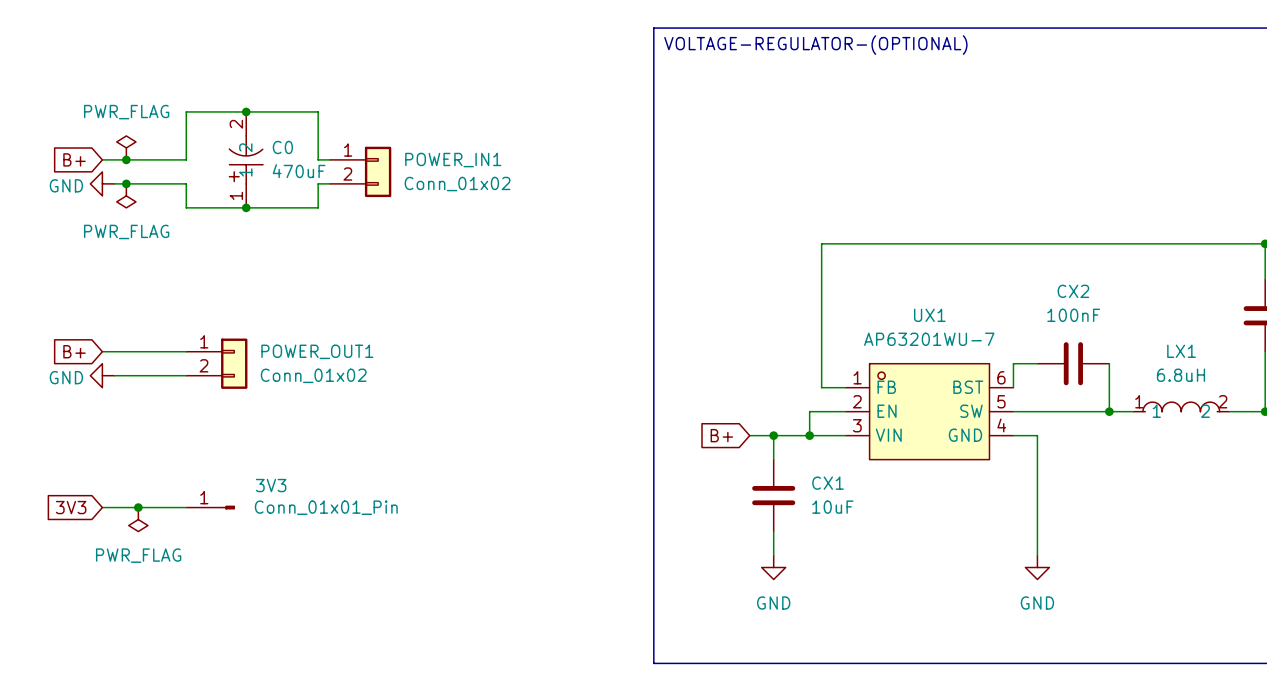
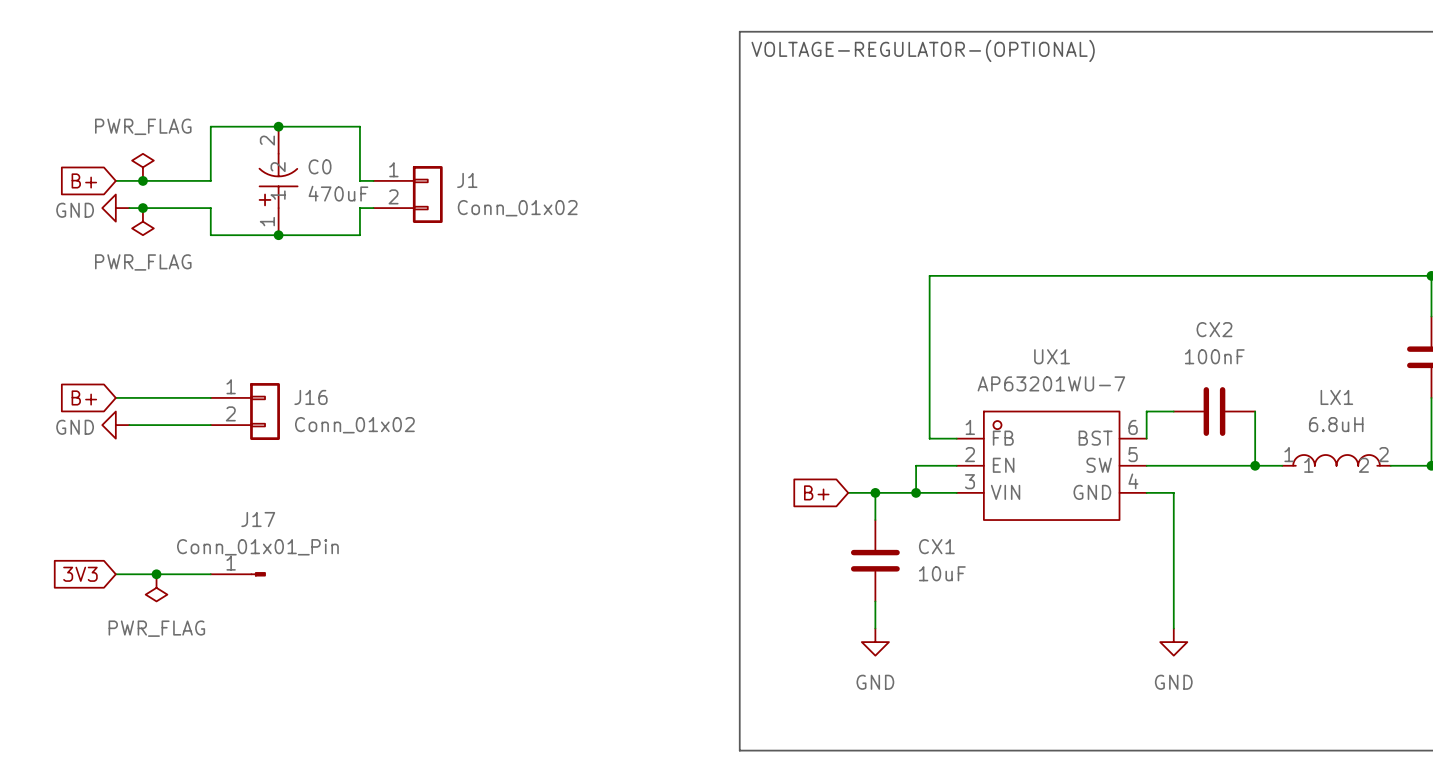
POWER_IN1 name: POWER_IN1 (453, 160) -> J1 (467, 180)
POWER_OUT1 name: POWER_OUT1 (317, 351) -> J16 (310, 397)
3V3 name: 3V3 (271, 485) -> J17 (258, 519)
3V3 value position: Conn_01x01_Pin (326, 507) -> Conn_01x01_Pin (257, 547)

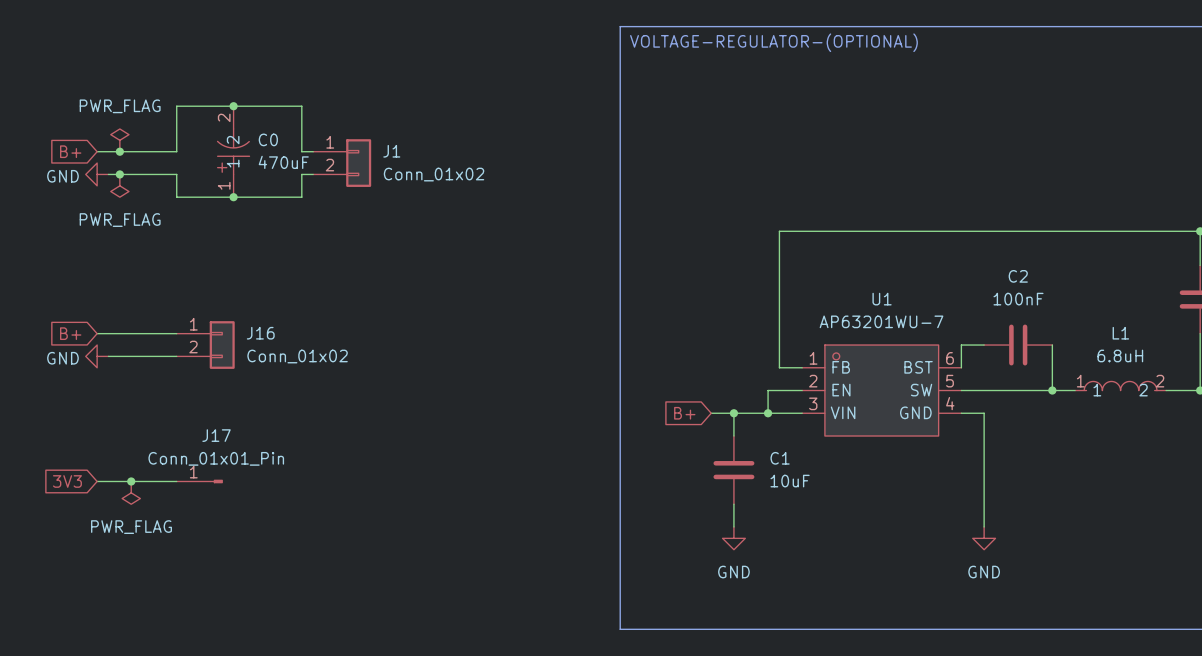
CX2 name: CX2 (1214, 329) -> C2 (1018, 276)
UX1 name: UX1 (1052, 356) -> U1 (882, 299)
LX1 name: LX1 (1336, 397) -> L1 (1120, 333)
CX1 name: CX1 (936, 546) -> C1 (780, 458)

